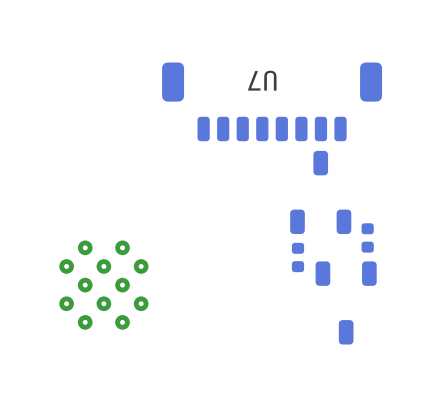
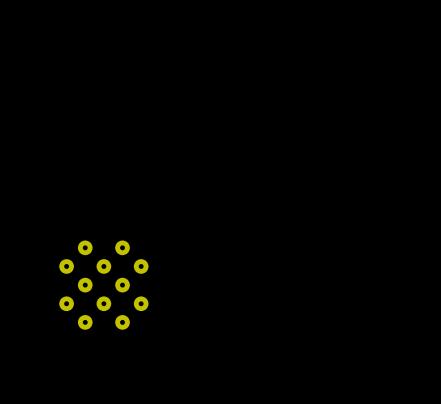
U7: (272, 101) -> none
part: (320, 192) -> none
part: (367, 237) -> none
part: (297, 257) -> none
part: (346, 302) -> none

